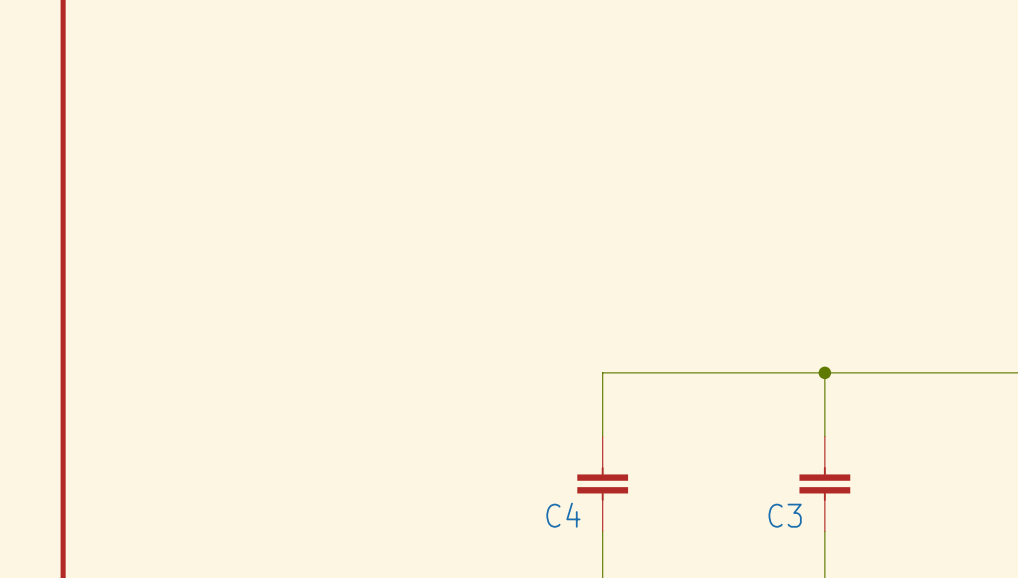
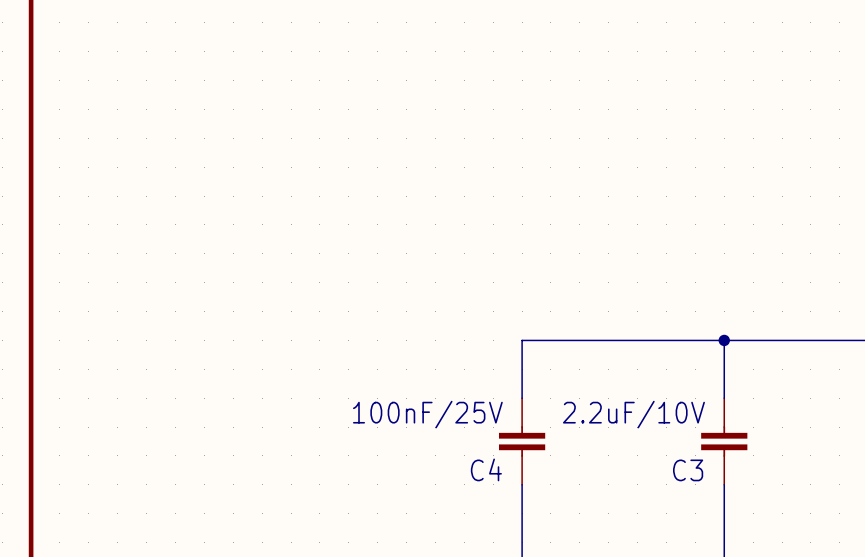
C4 value: none -> 100nF/25V (427, 414)
C3 value: none -> 2.2uF/10V (633, 414)

